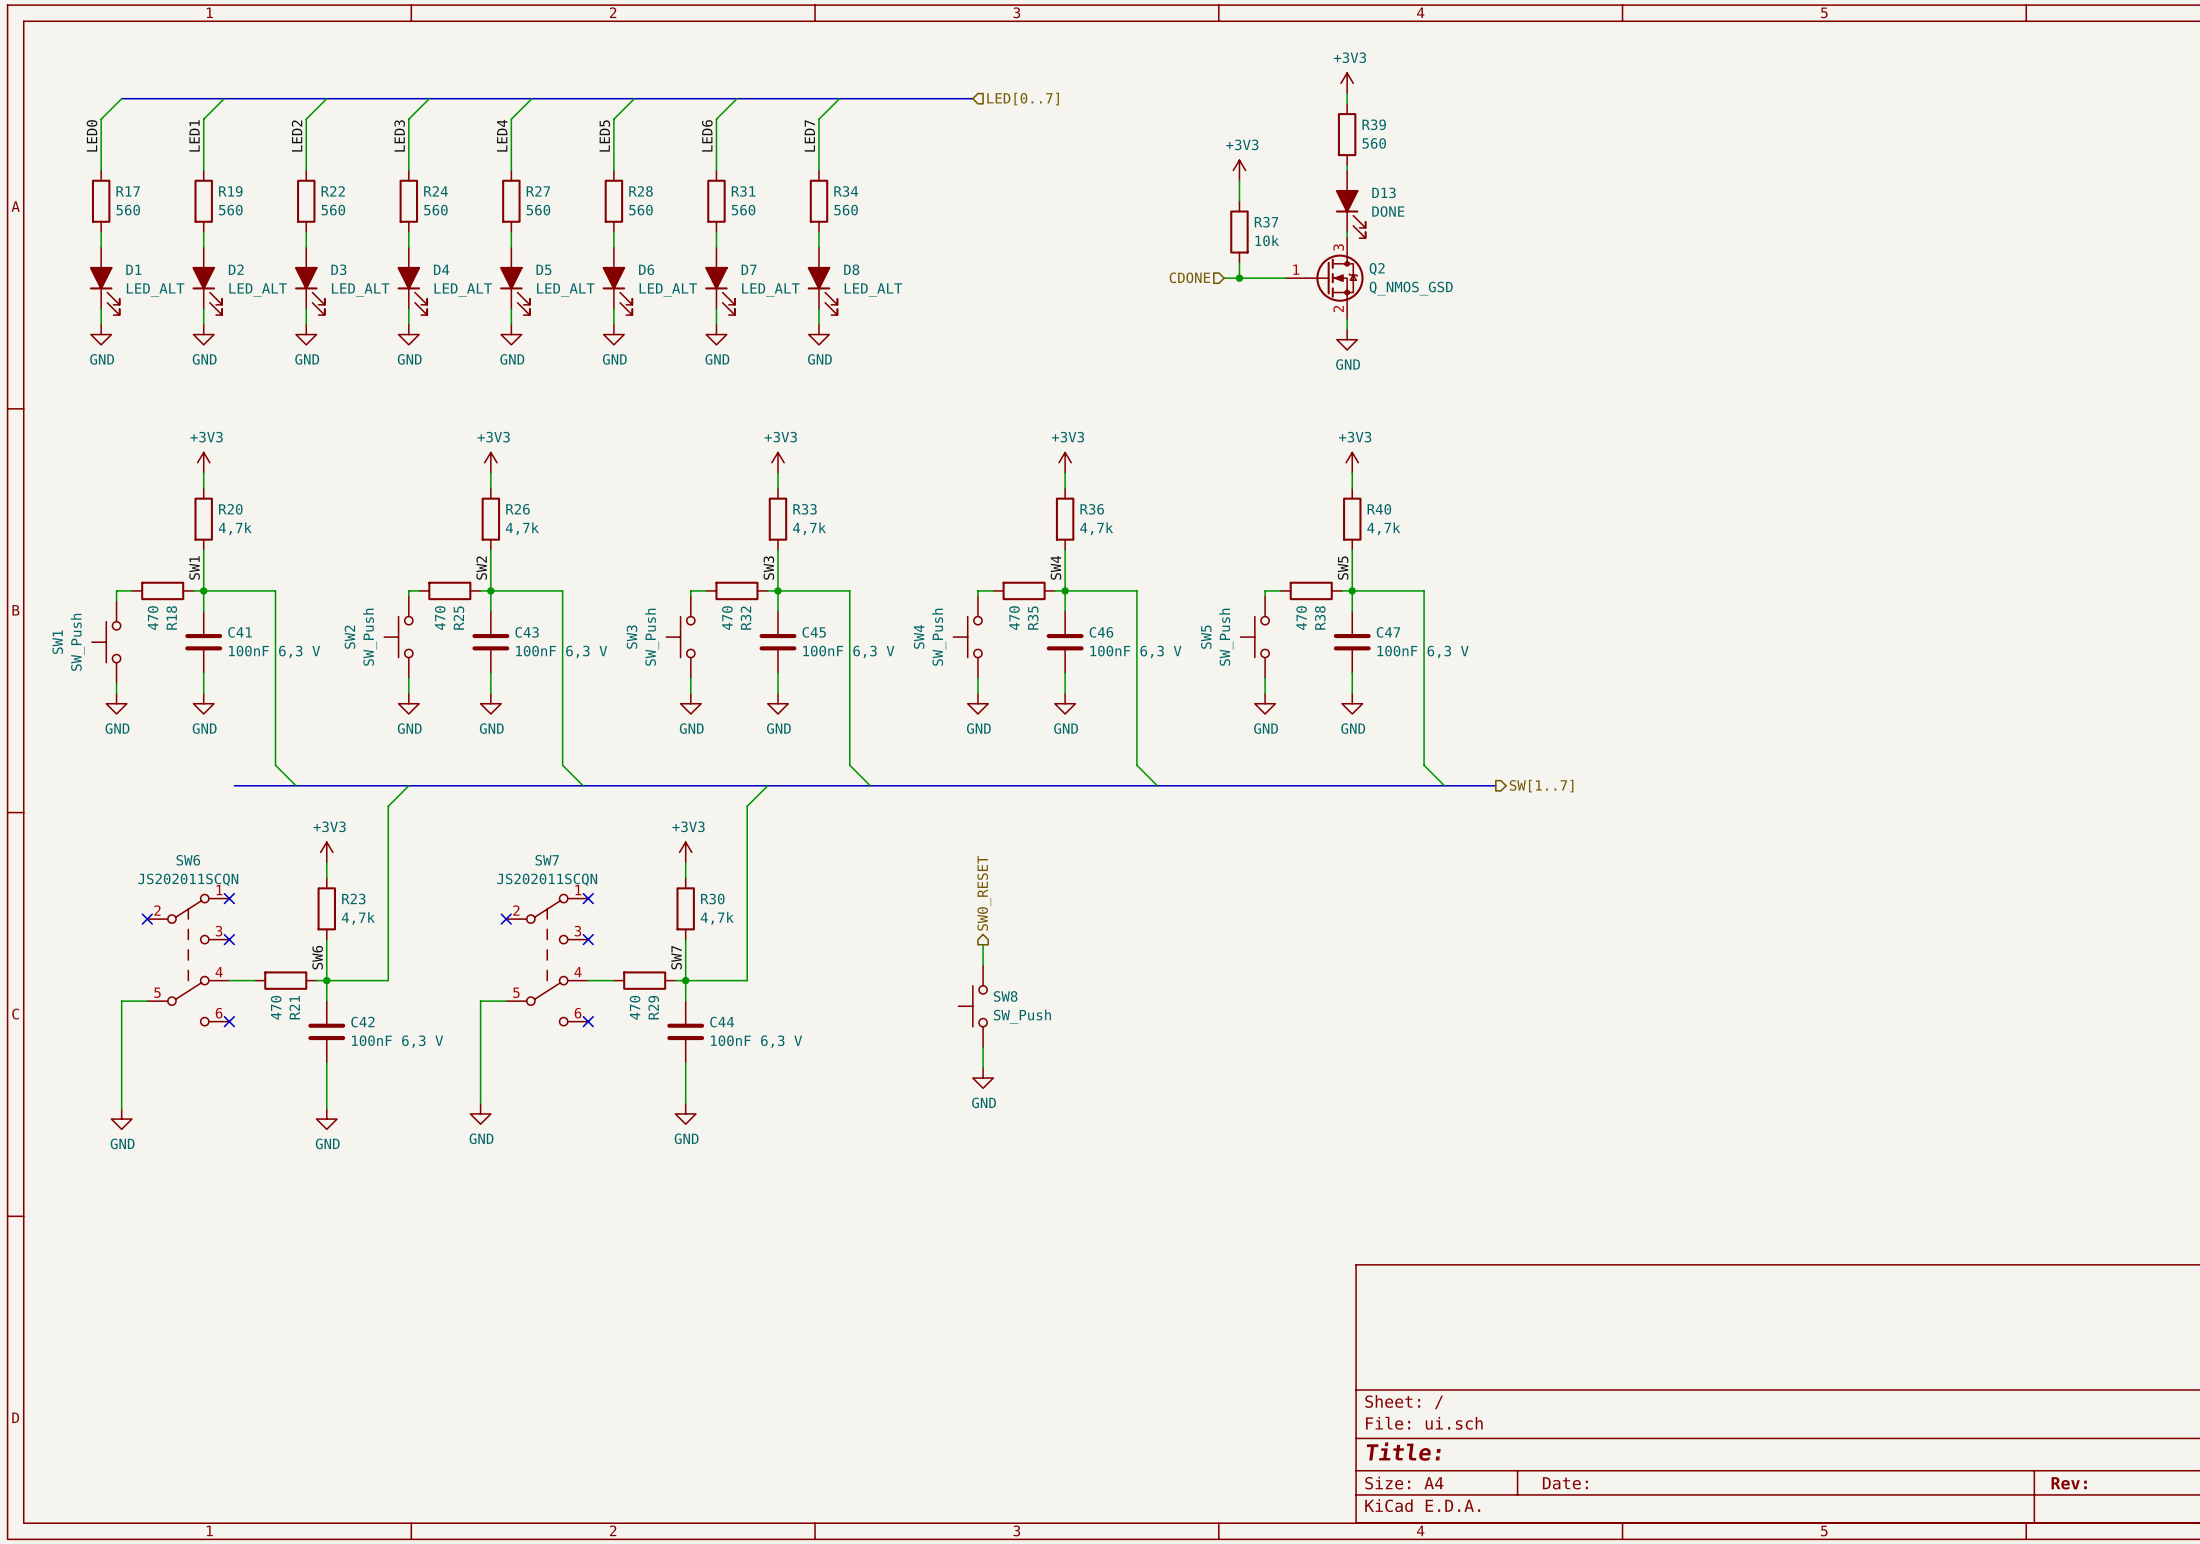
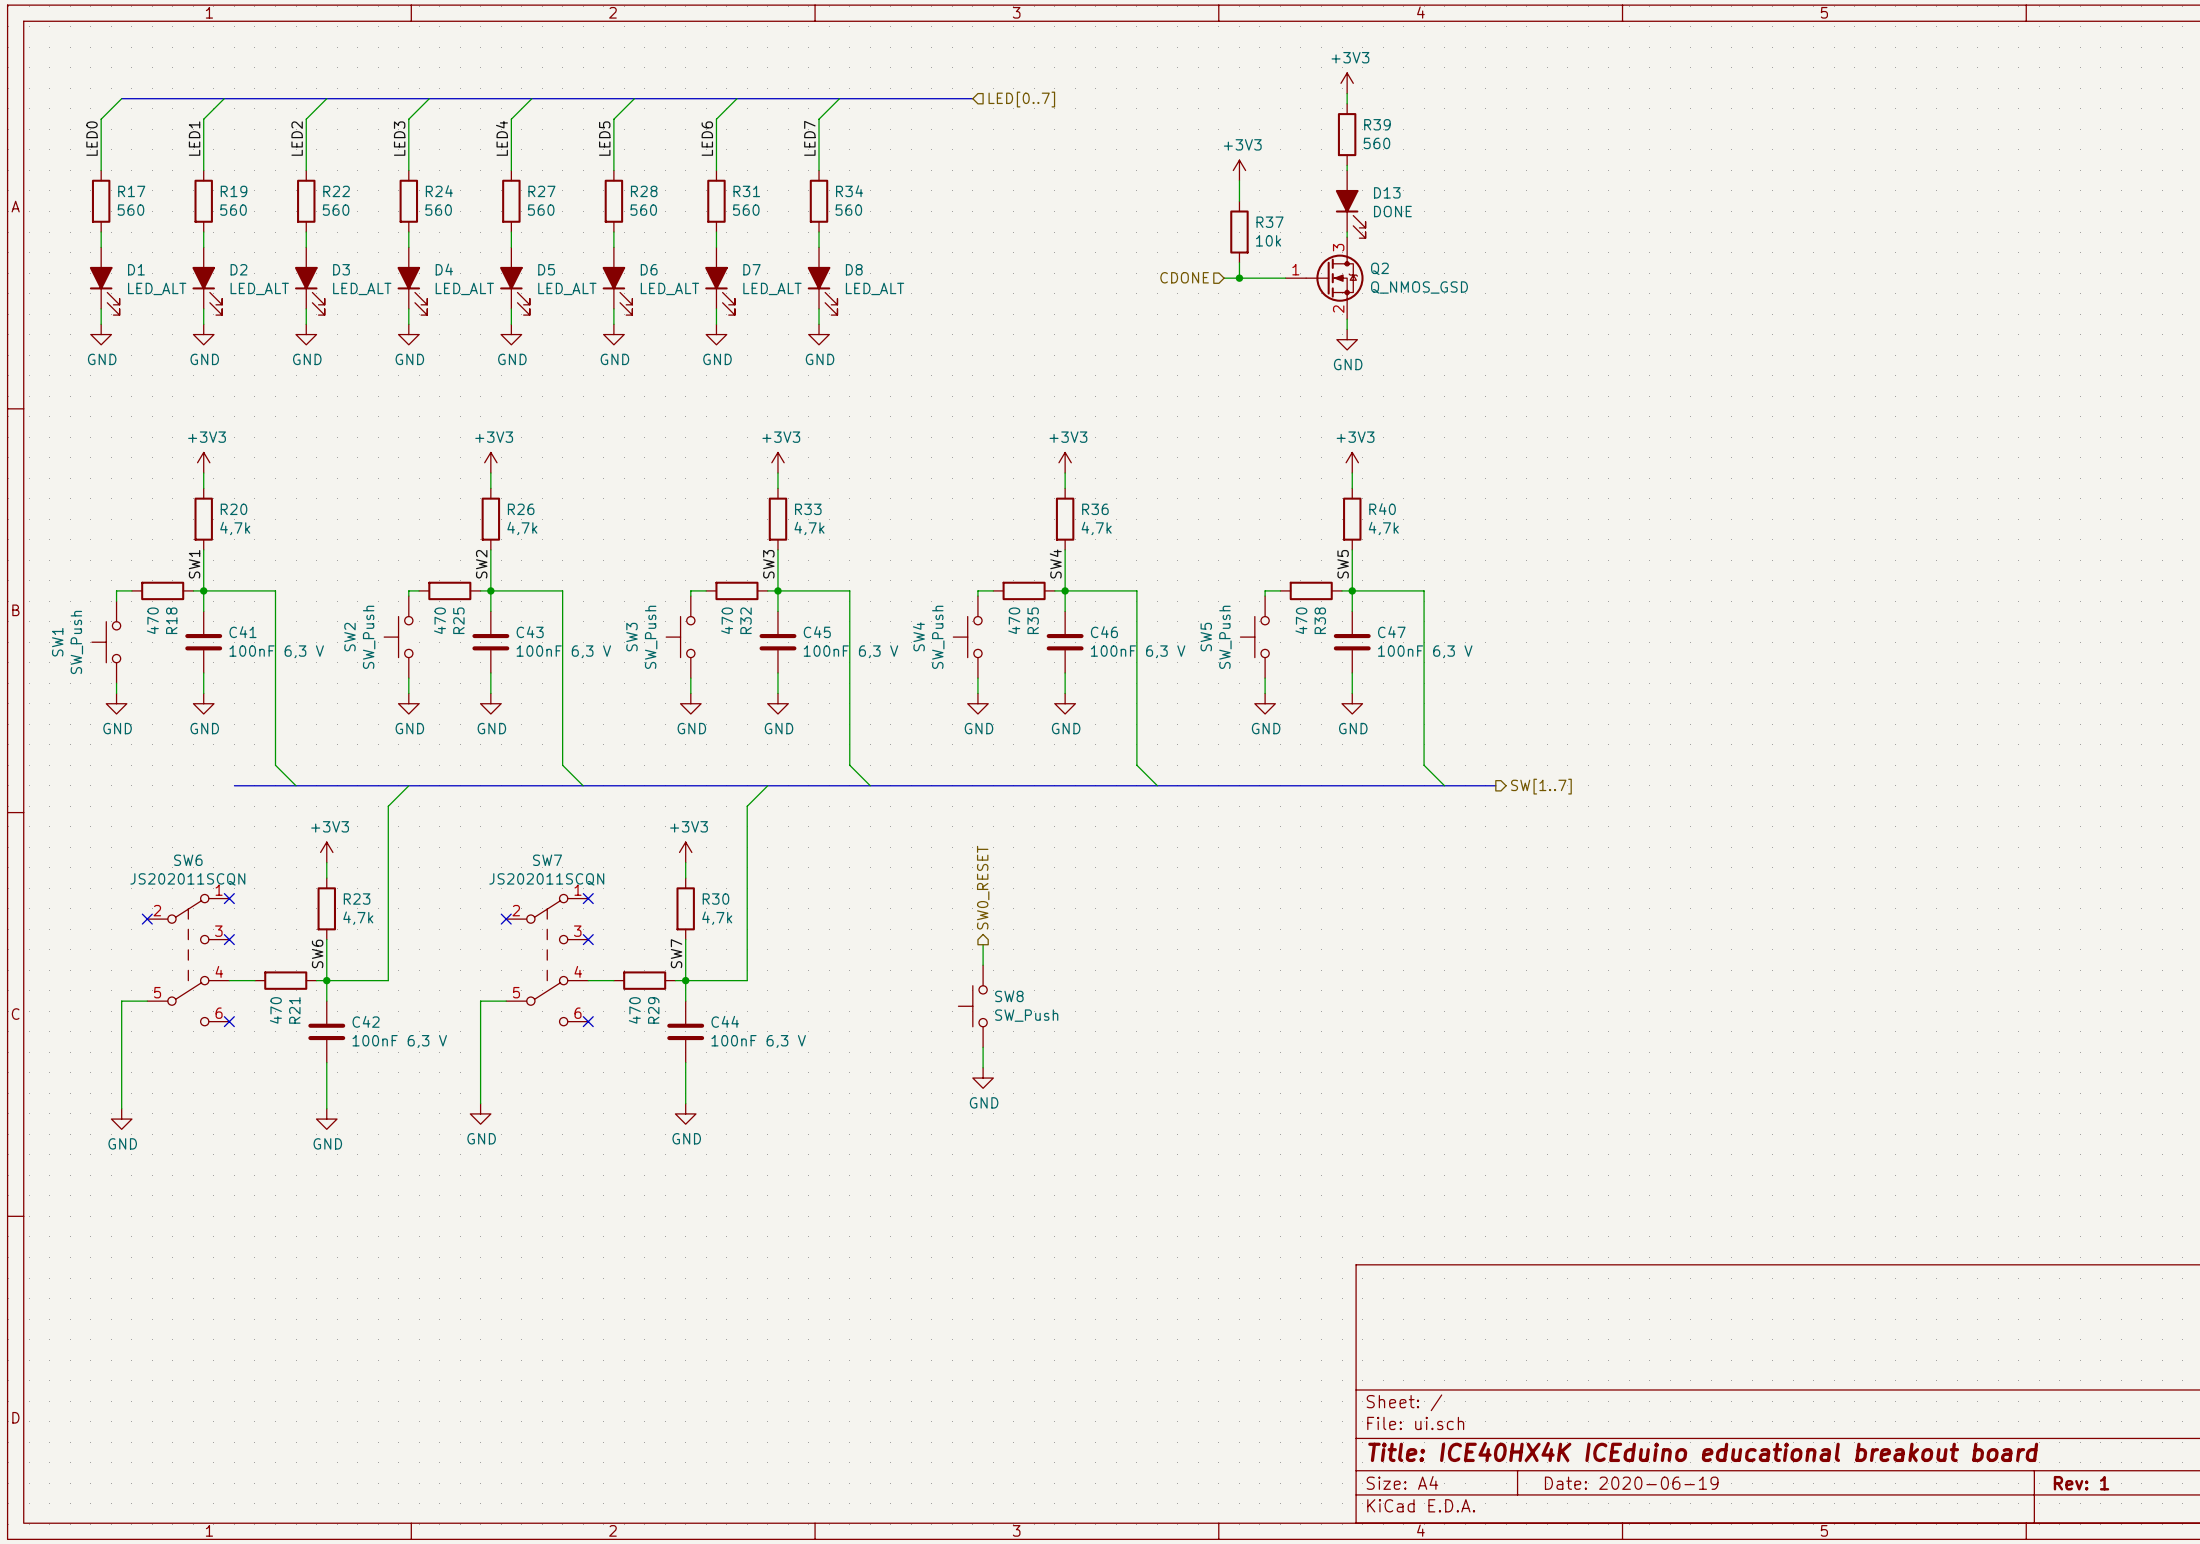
title block: Title: (1403, 1451) -> Title: ICE40HX4K ICEduino educational breakout board (1703, 1451)
title block: Date: (1565, 1483) -> Date: 2020-06-19 (1631, 1483)
title block: Rev: (2069, 1483) -> Rev: 1 (2081, 1483)

